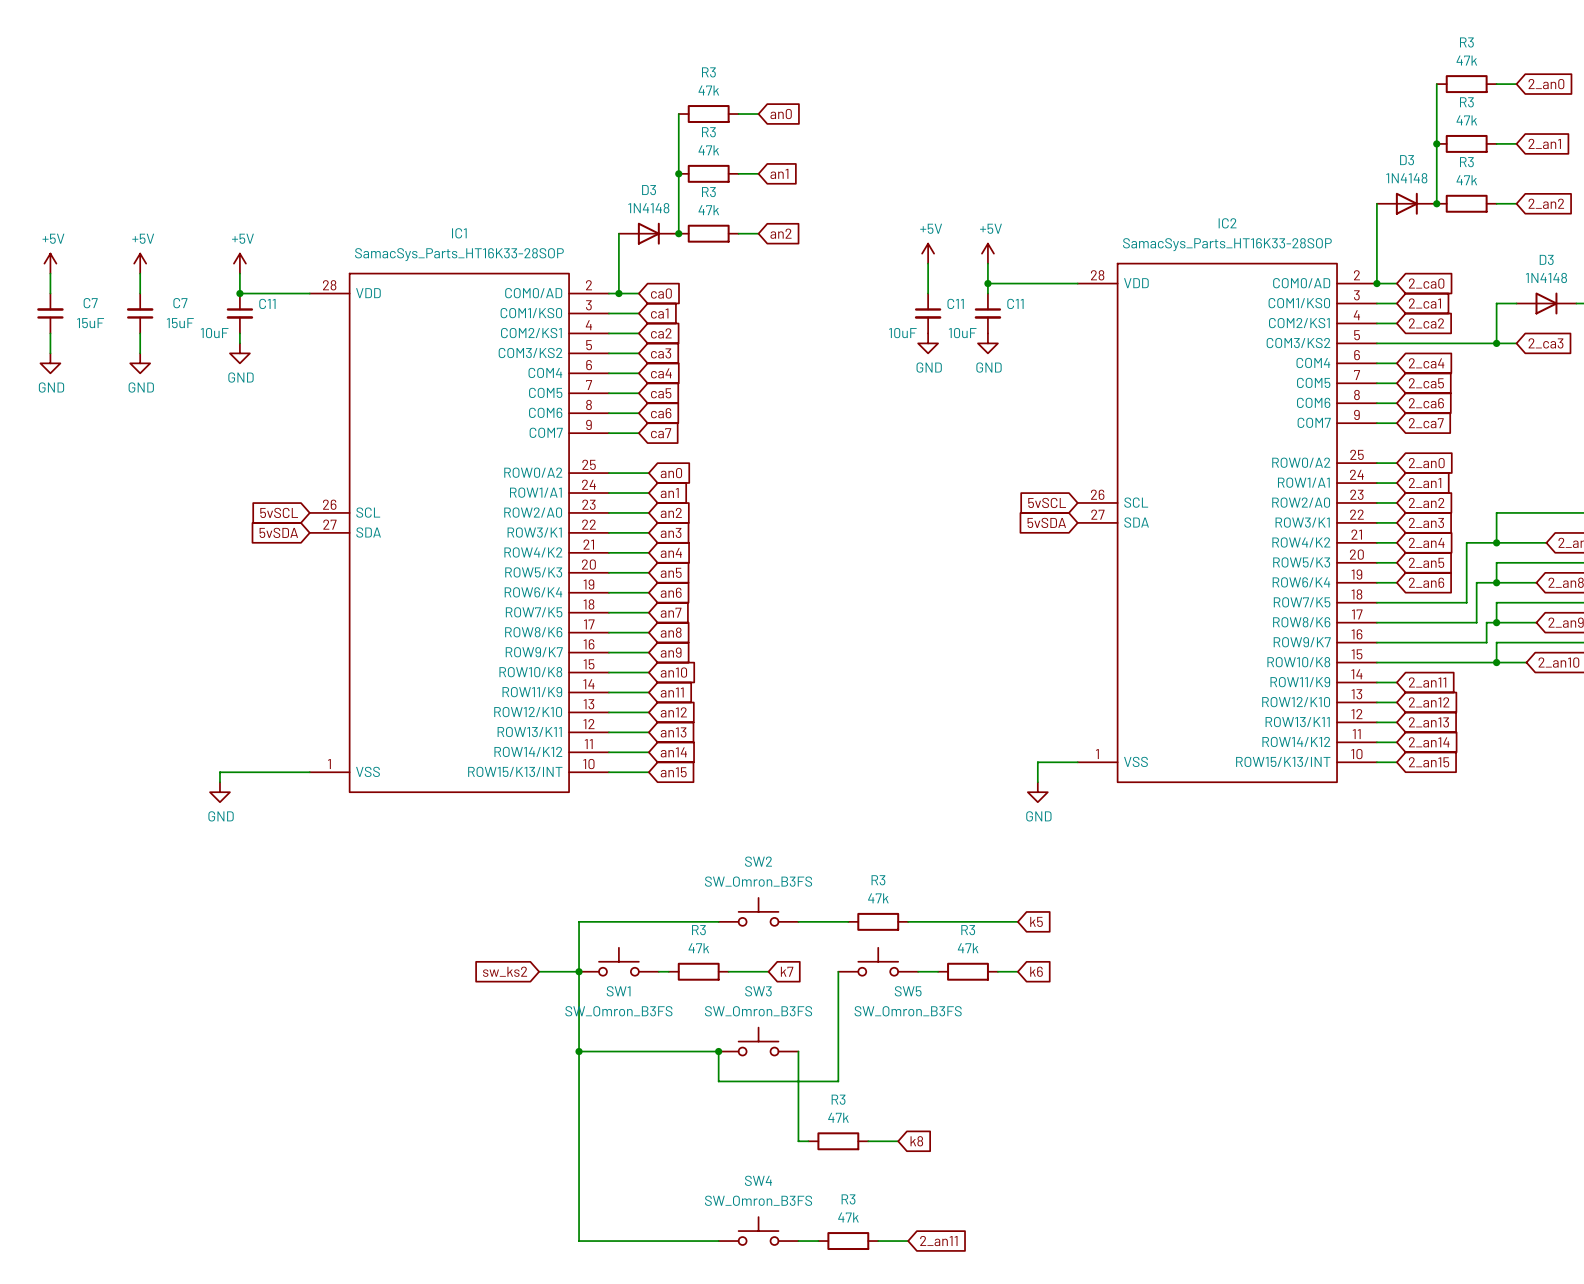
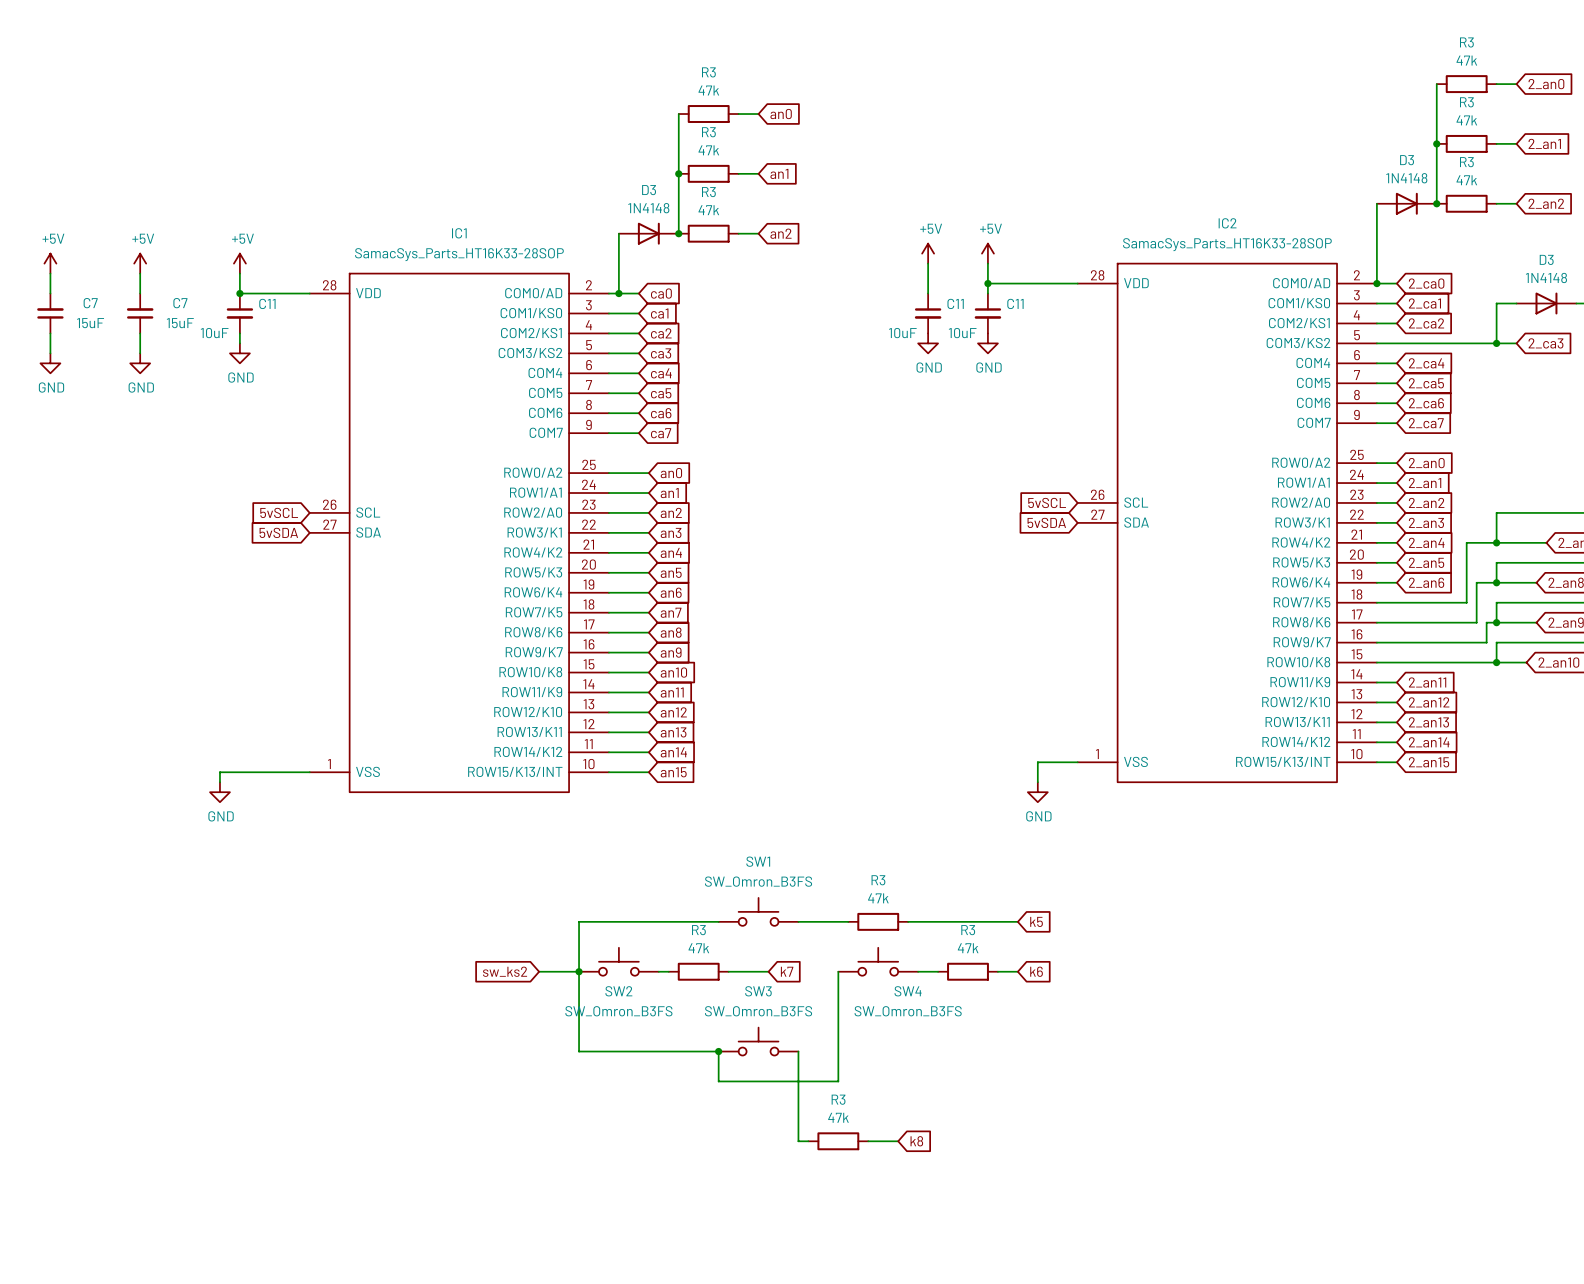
SW2 name: SW2 (758, 861) -> SW1 (758, 861)
SW1 name: SW1 (618, 991) -> SW2 (618, 991)
SW5 name: SW5 (908, 991) -> SW4 (908, 991)
wire: (579, 1051) (579, 1241) (718, 1241) -> none
junction: (579, 1051) -> none
SW4: SW_Omron_B3FS (758, 1231) -> none
wire: (798, 1241) (818, 1241) -> none
R3: 47k (848, 1241) -> none
wire: (878, 1241) (908, 1241) -> none
global label: 2_an11 (938, 1241) -> none

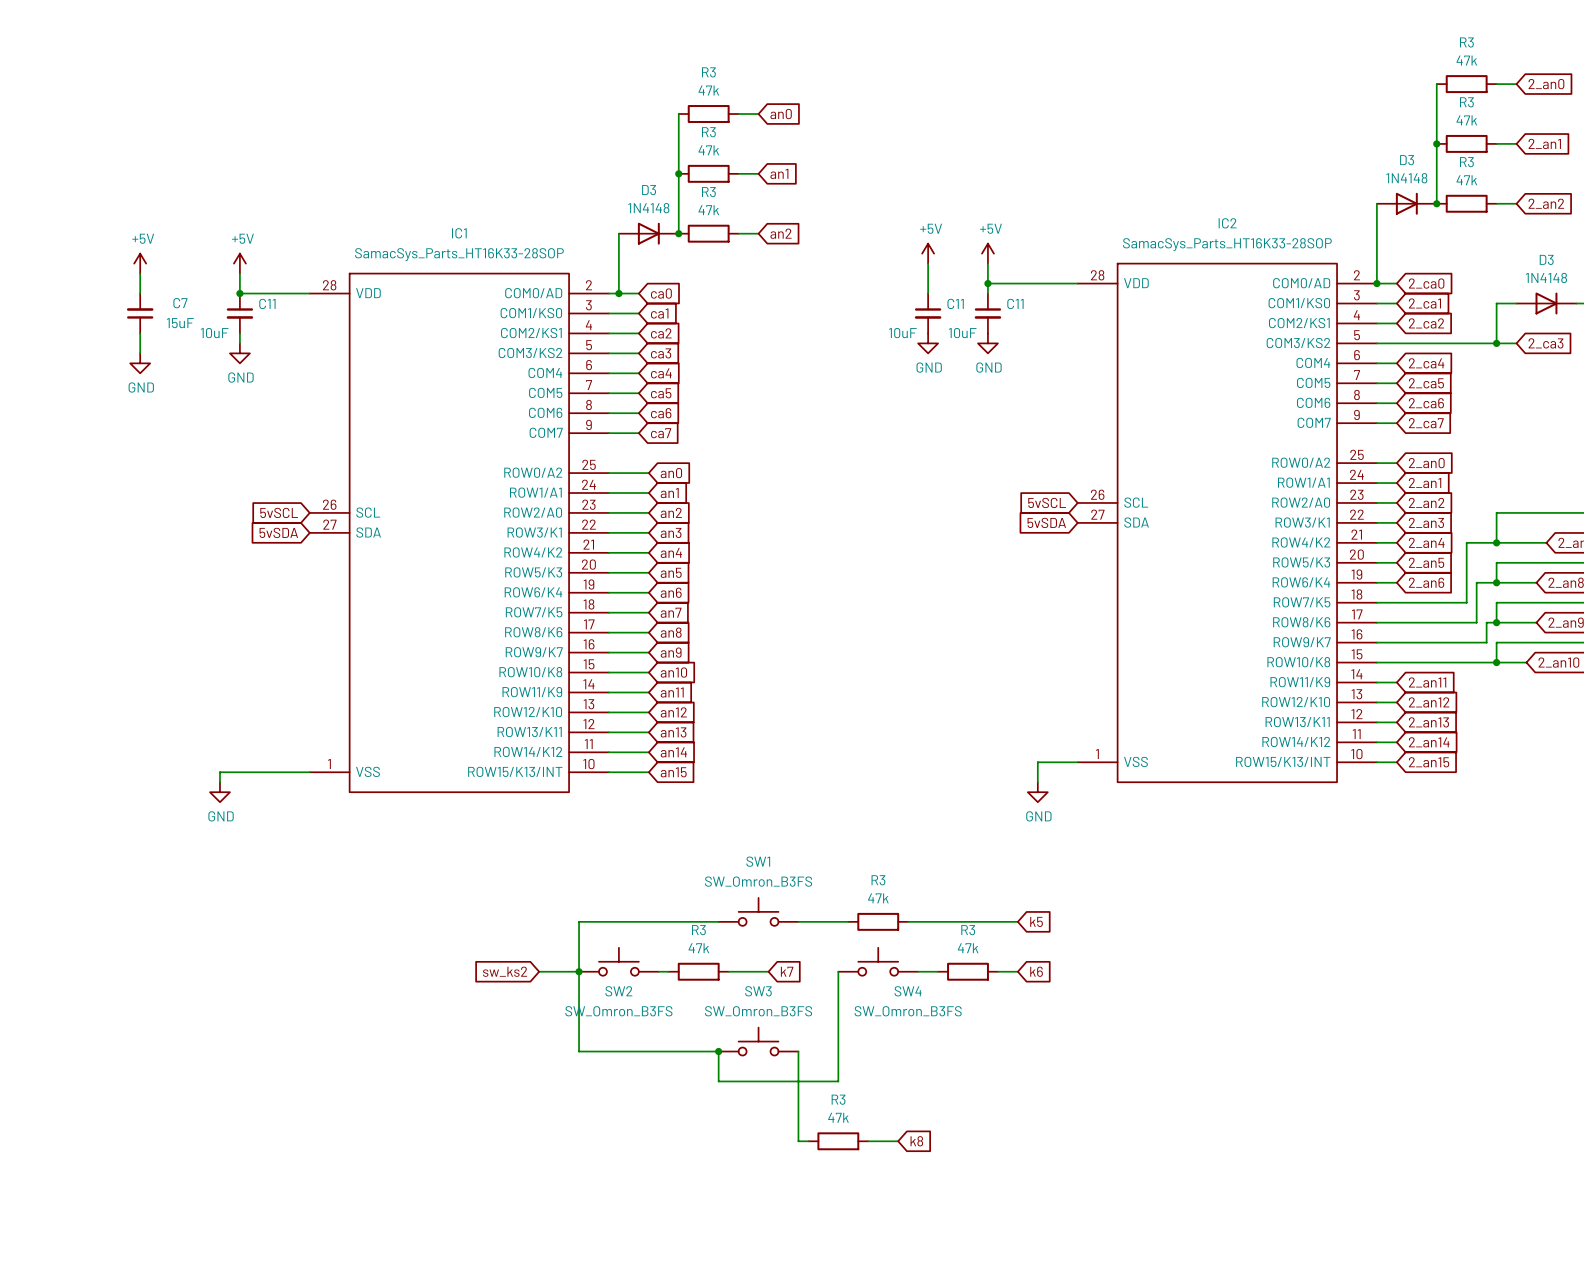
power symbol: +5V (50, 263) -> none
wire: (50, 273) (50, 293) -> none
C7: 15uF (50, 313) -> none
wire: (50, 333) (50, 353) -> none
power symbol: GND (50, 363) -> none

